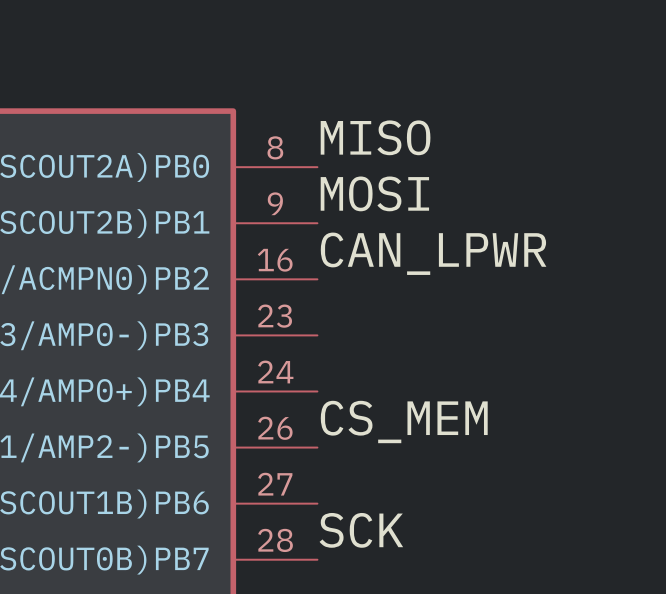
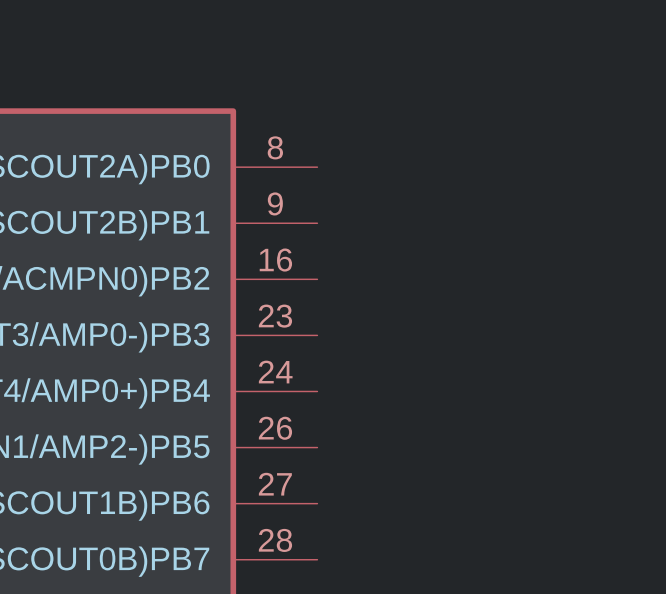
label: MISO (375, 137) -> none
label: MOSI (374, 193) -> none
label: CAN_LPWR (433, 253) -> none
label: CS_MEM (404, 421) -> none
label: SCK (361, 530) -> none

